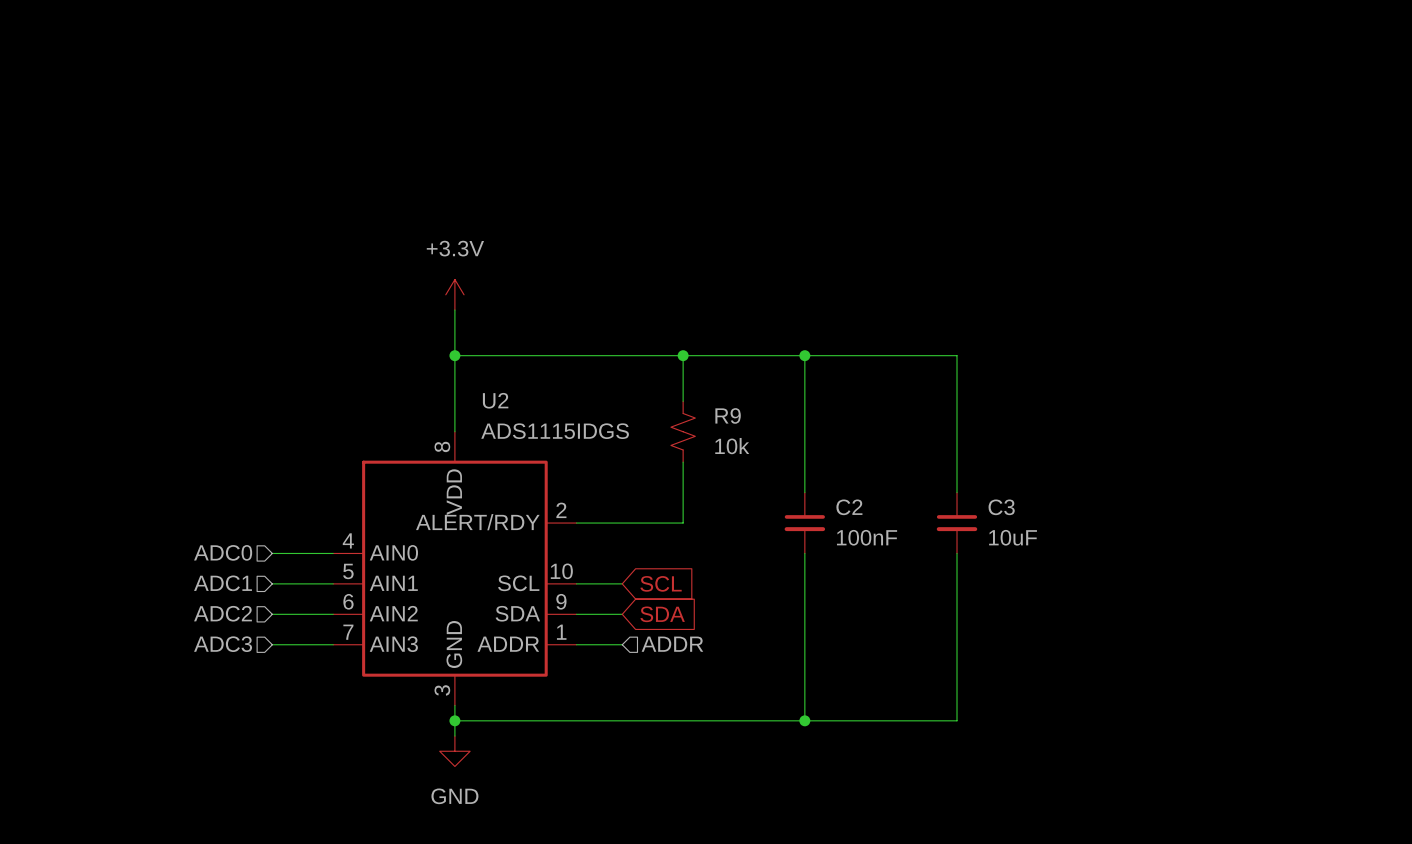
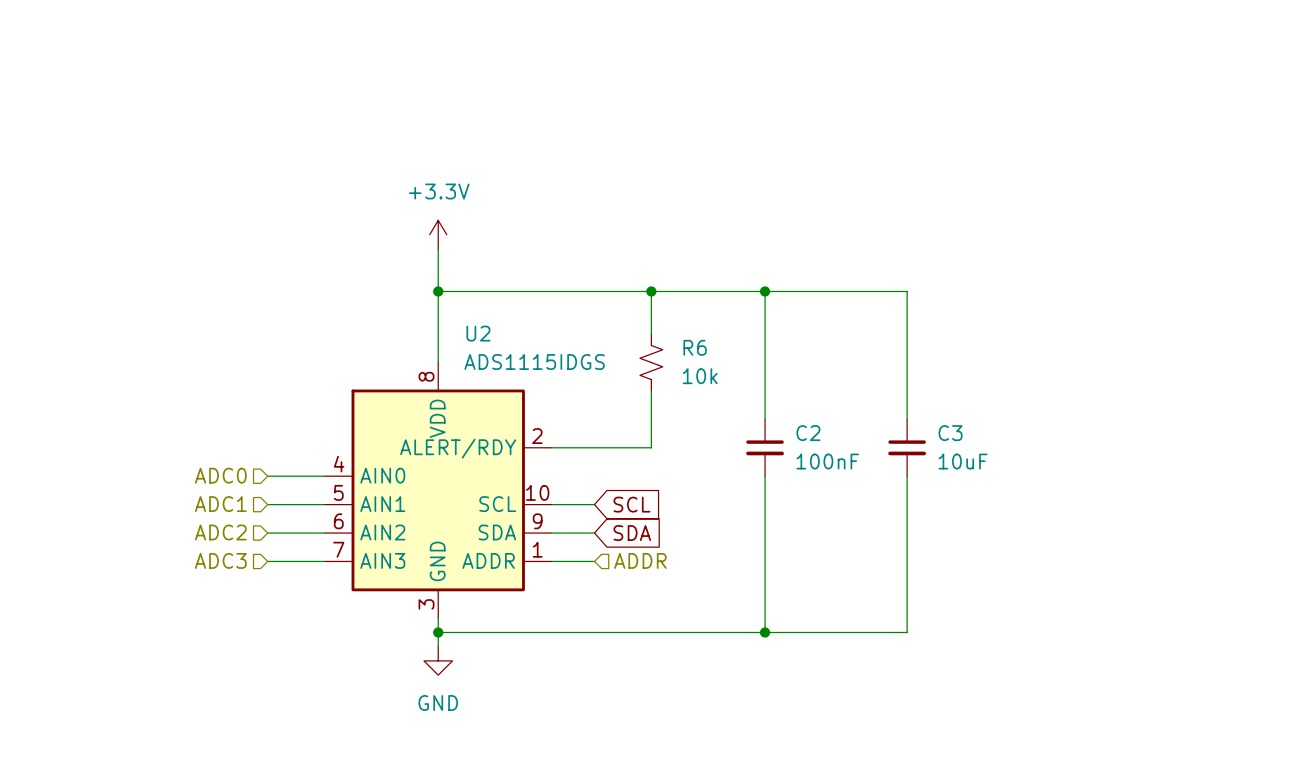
R9 name: R9 (728, 415) -> R6 (695, 347)

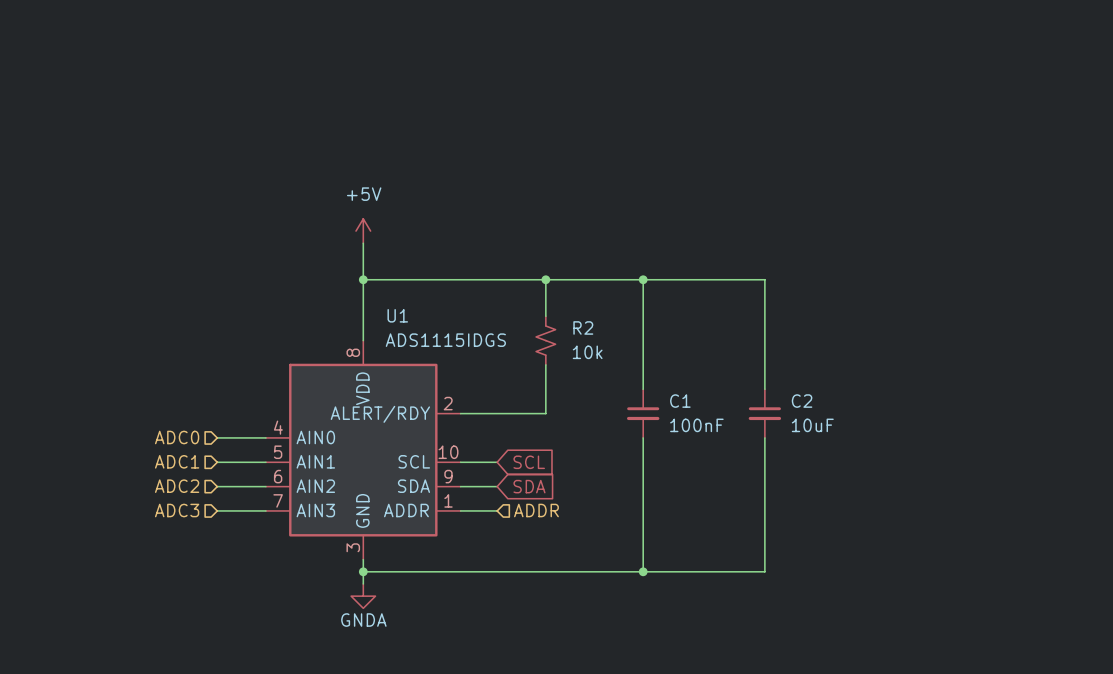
power symbol: +3.3V (438, 234) -> +5V (363, 231)
U2 name: U2 (478, 333) -> U1 (397, 315)
R6 name: R6 (695, 347) -> R2 (583, 327)
C2 name: C2 (808, 433) -> C1 (680, 401)
C3 name: C3 (950, 433) -> C2 (802, 401)
power symbol: GND (438, 660) -> GNDA (363, 596)

